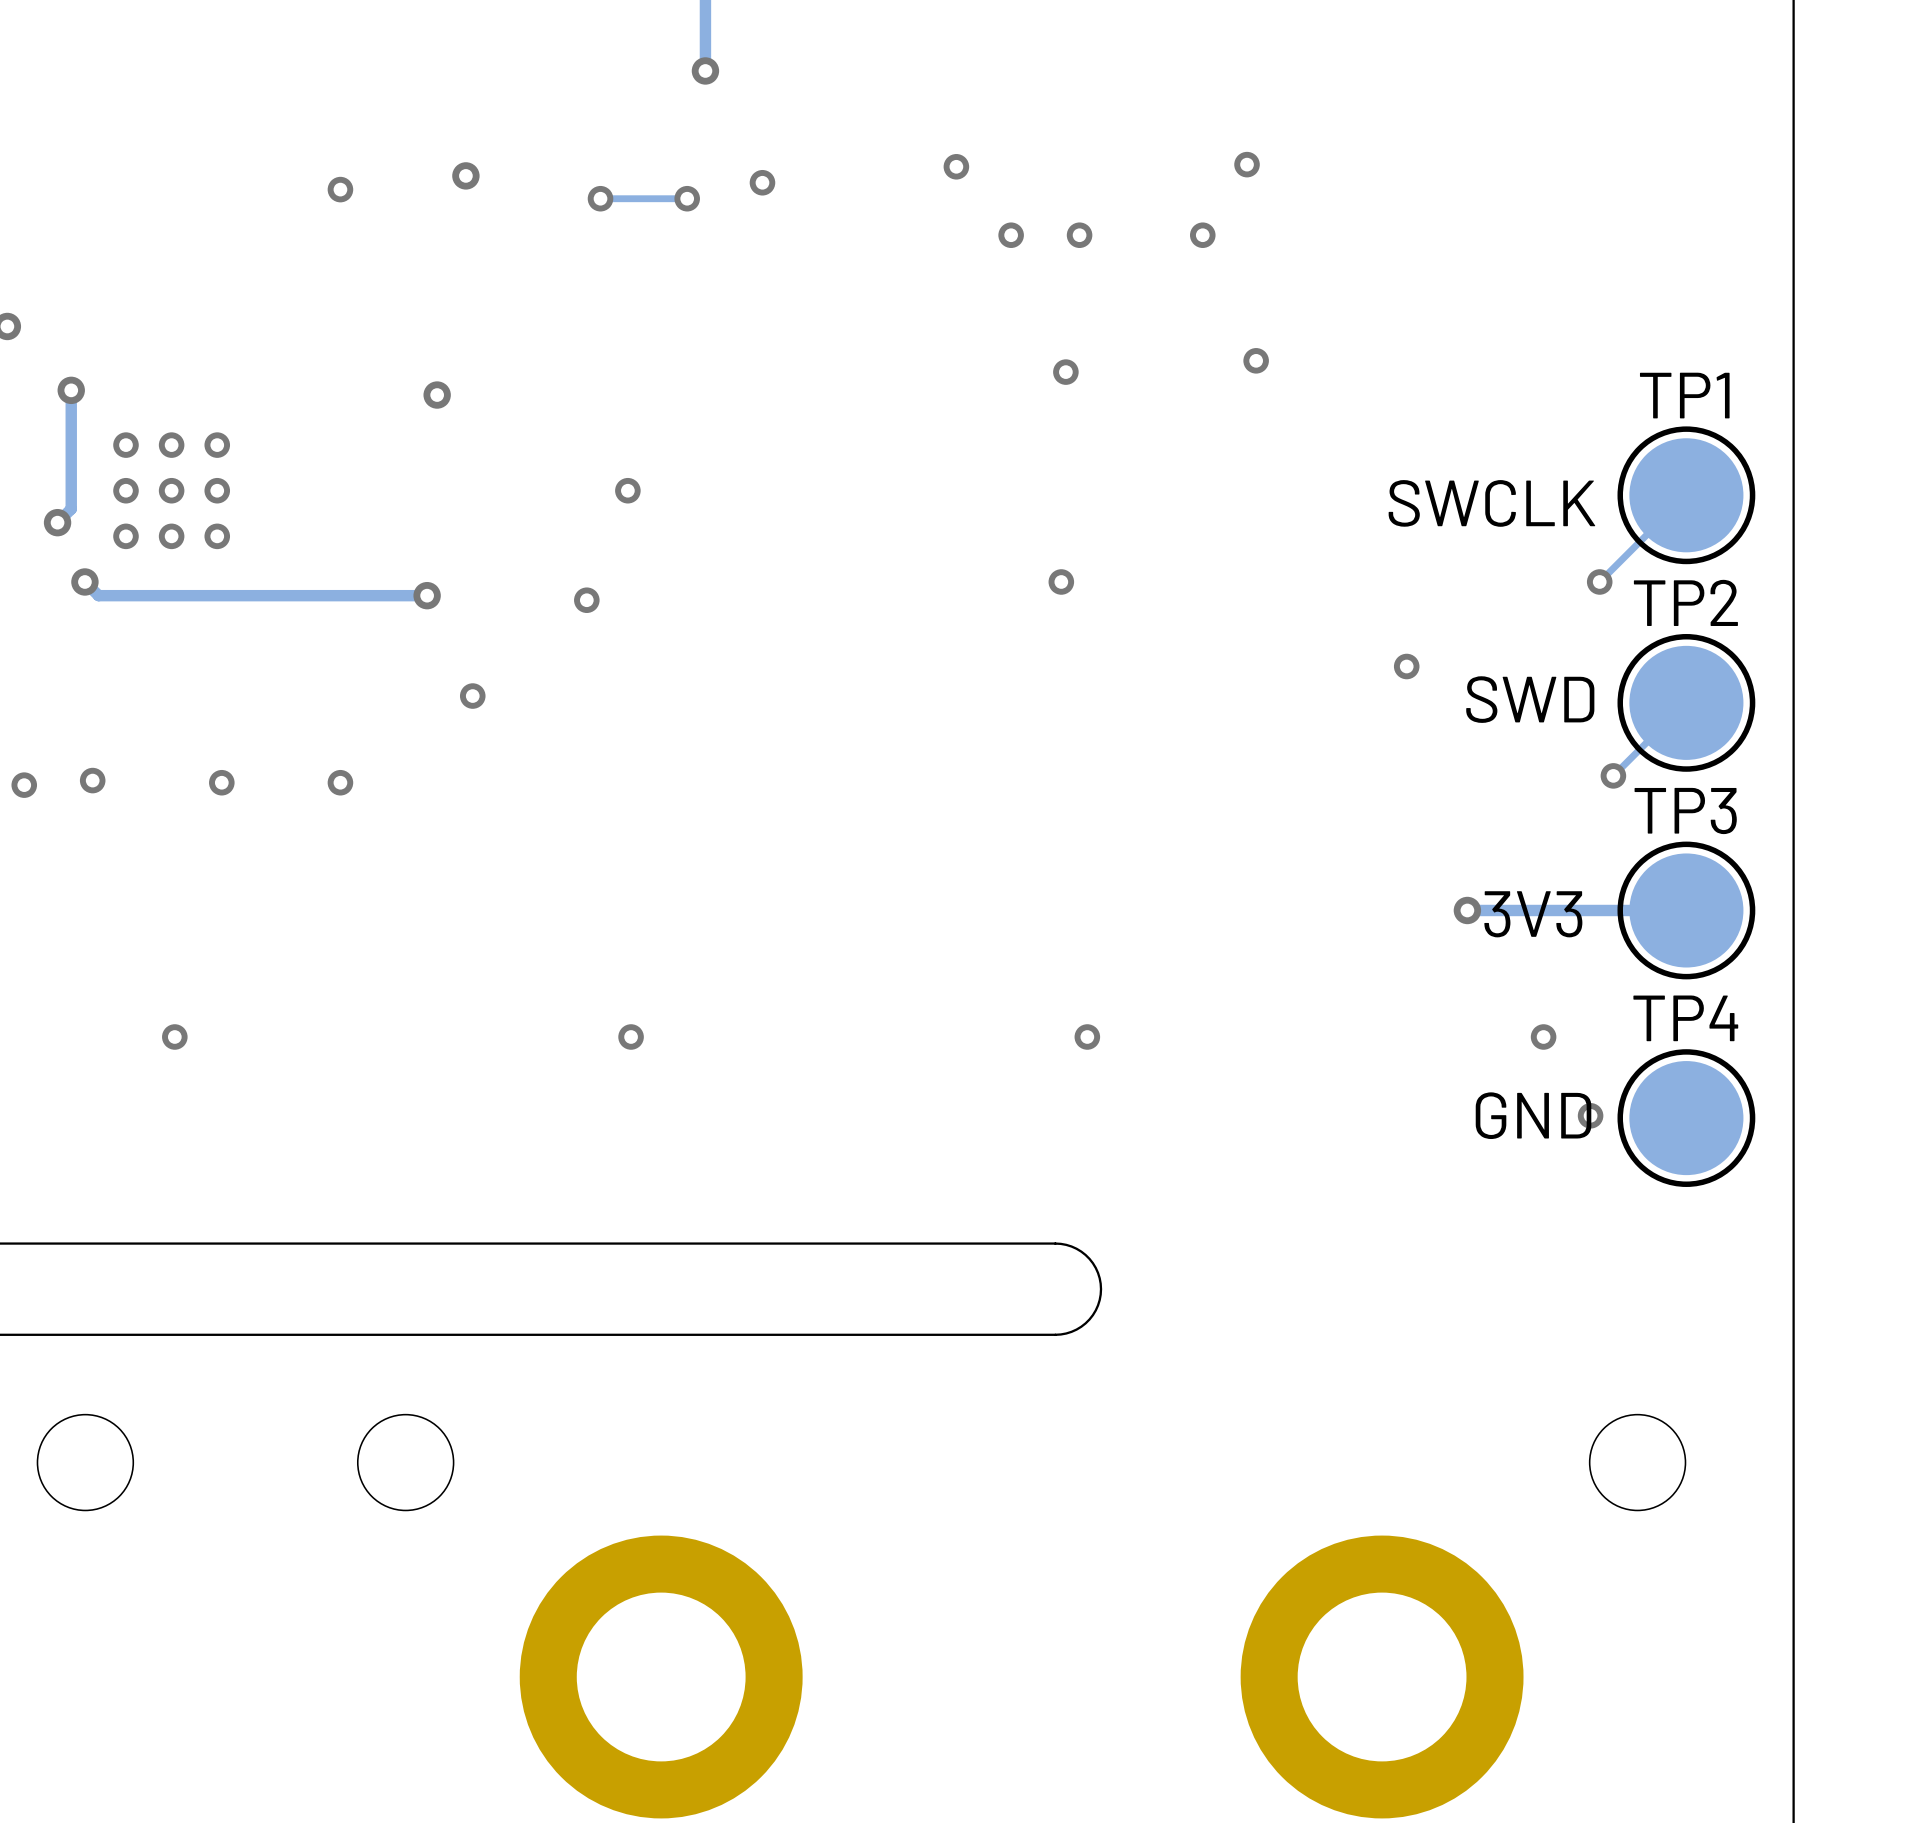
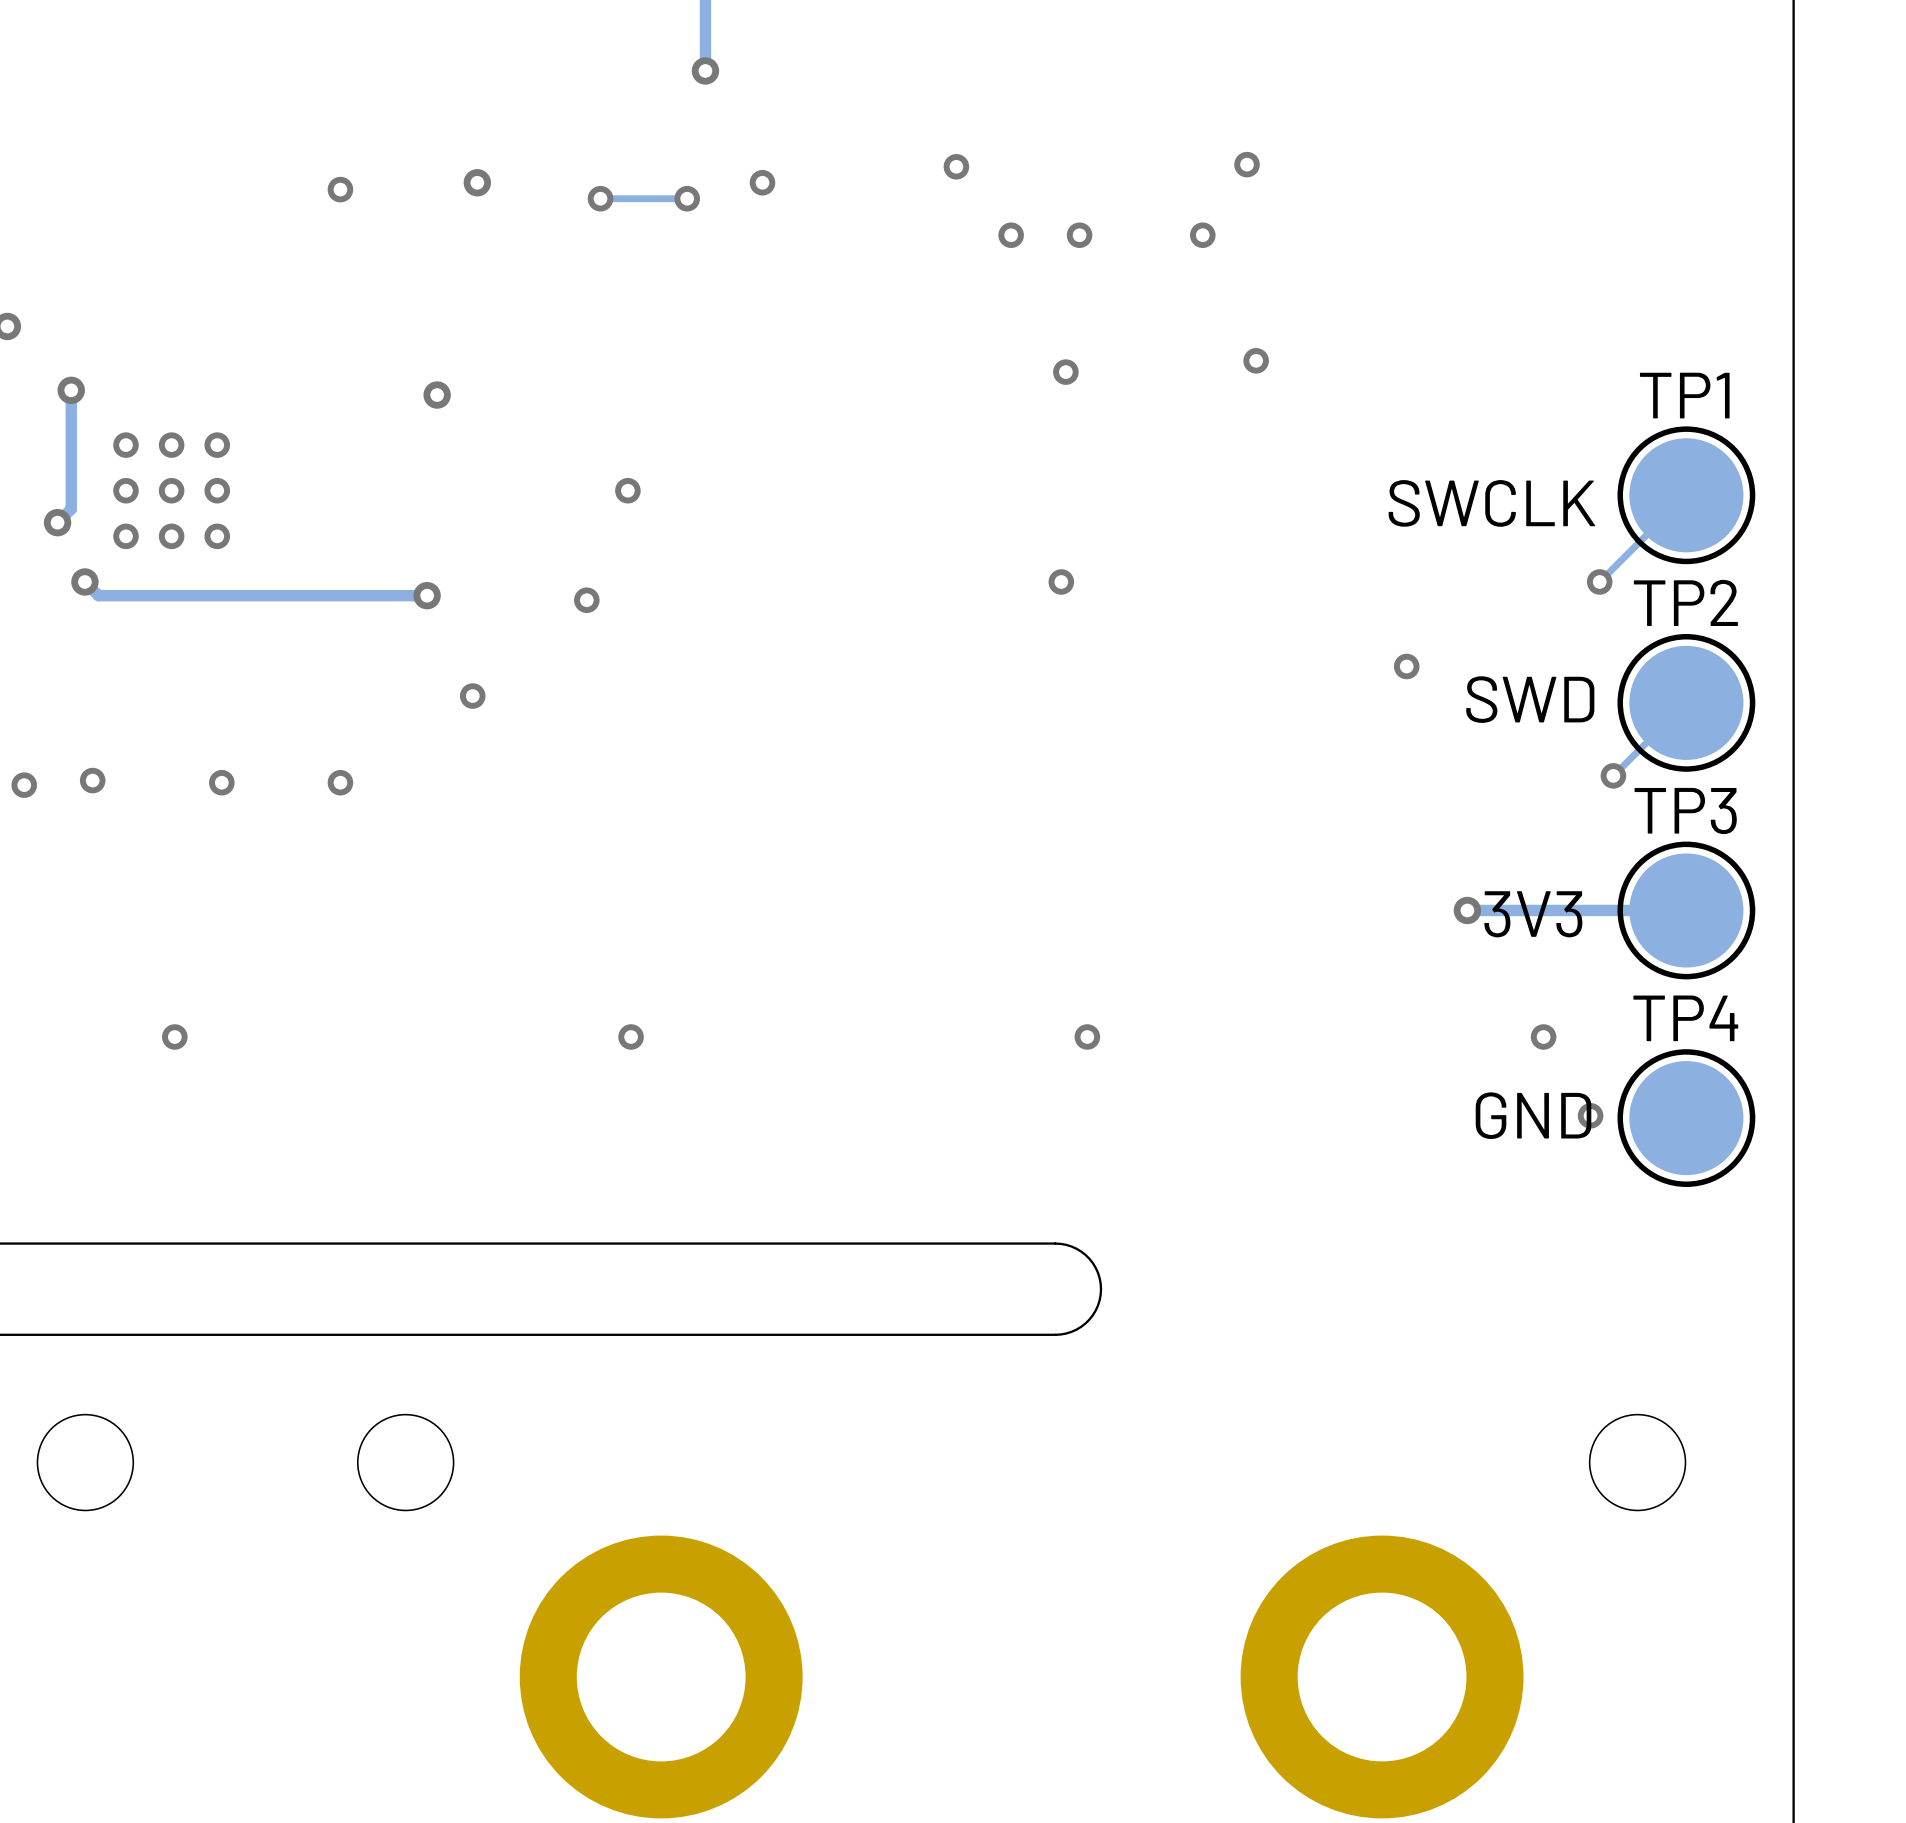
via position: (465, 175) -> (477, 182)

